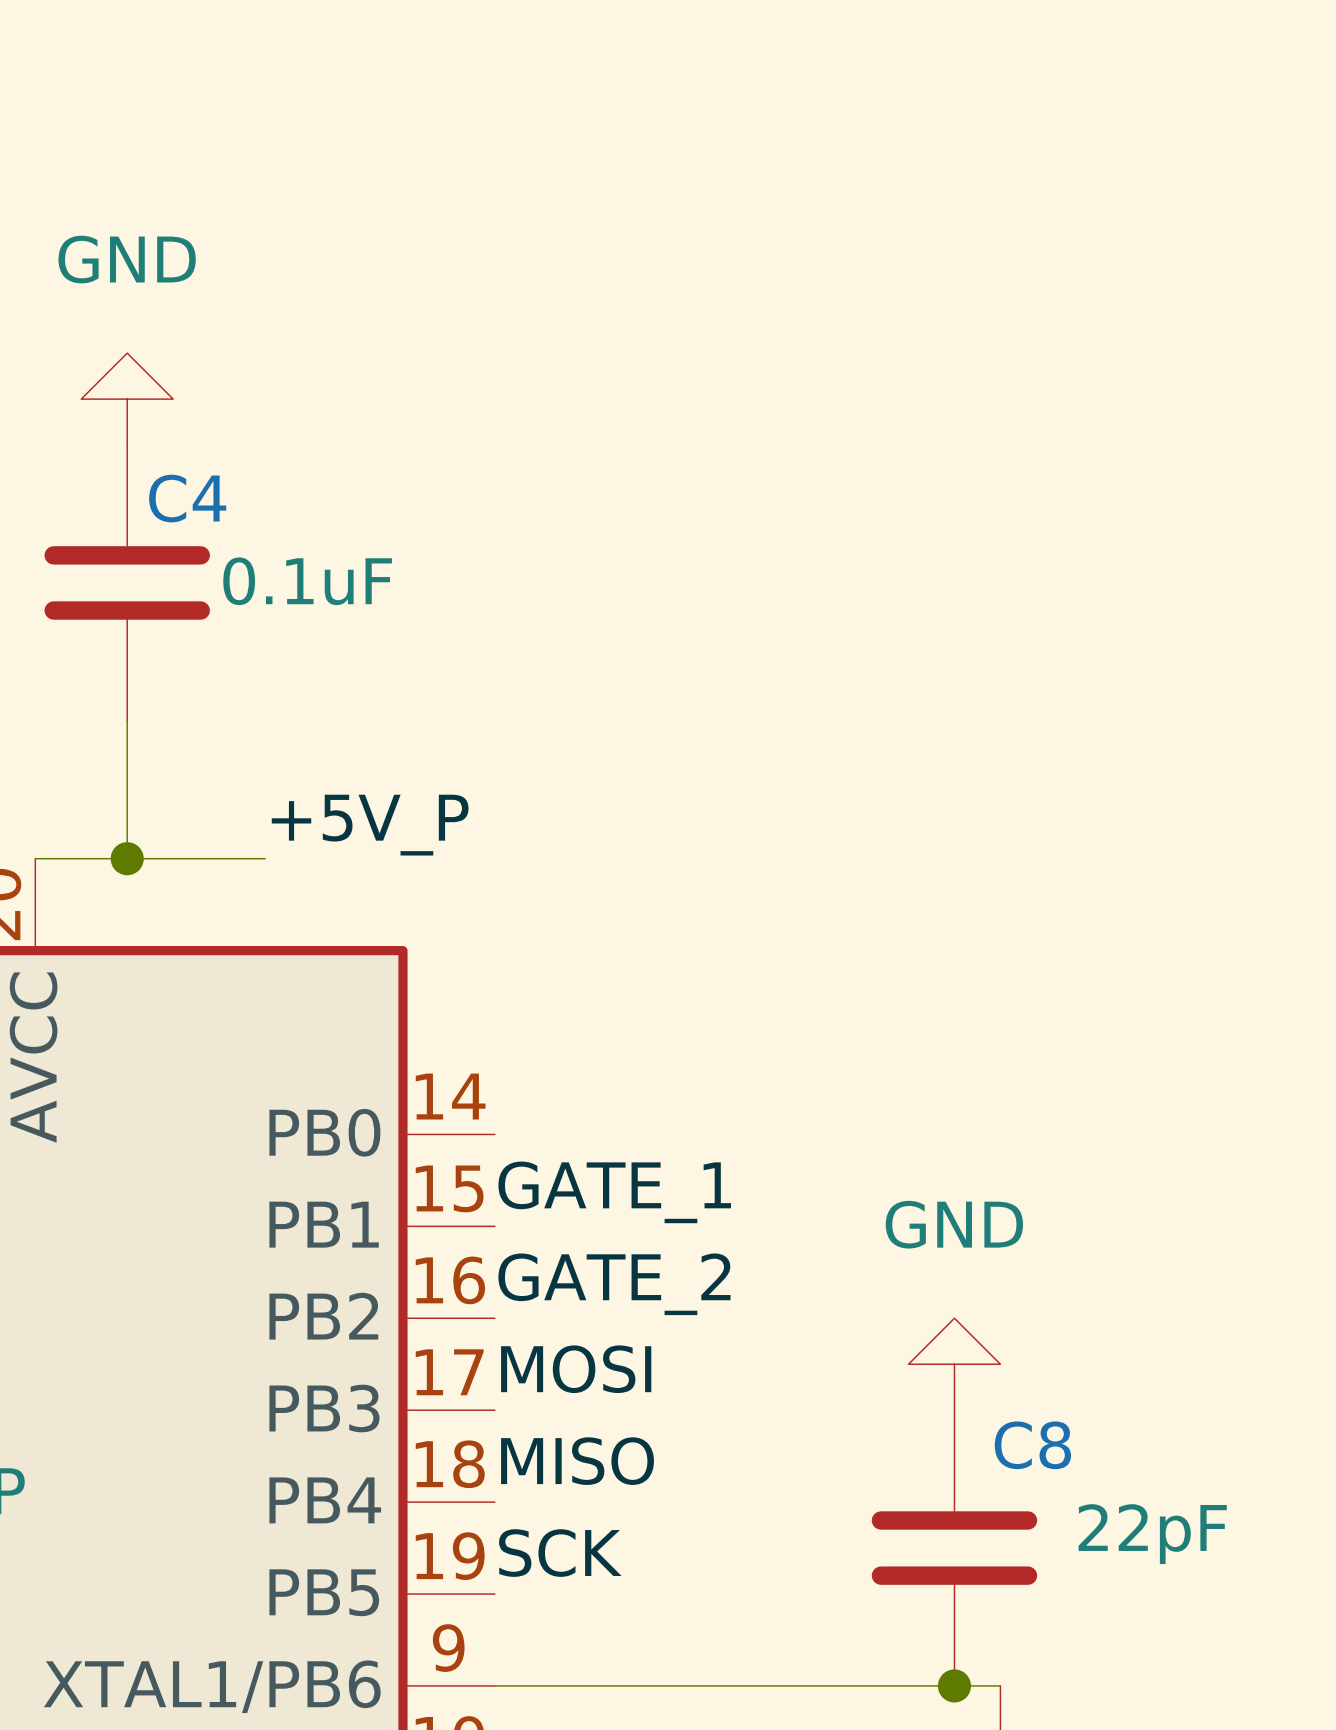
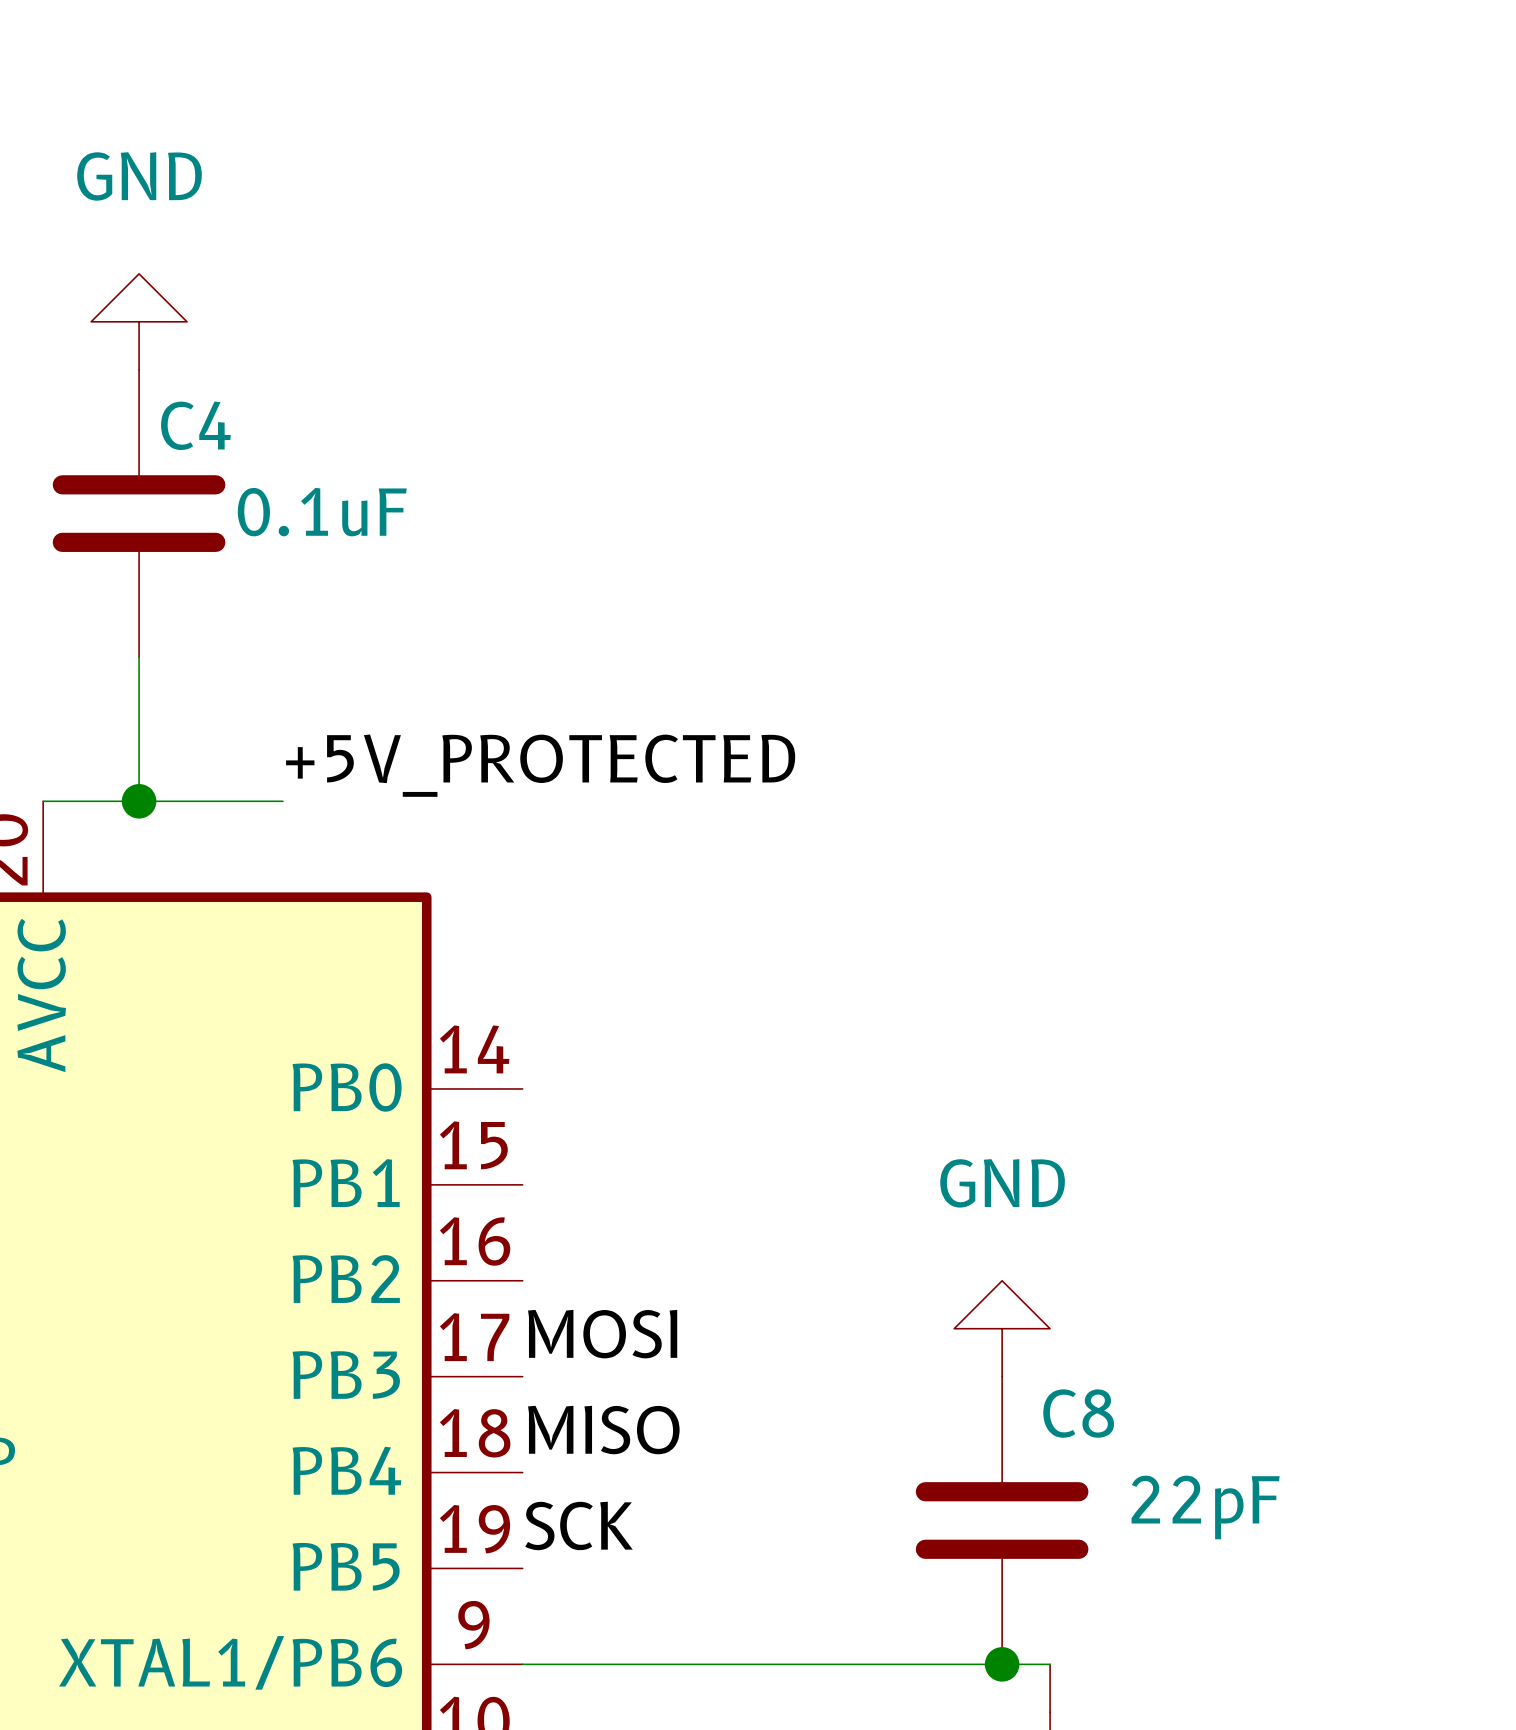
label: +5V_P (370, 825) -> +5V_PROTECTED (540, 765)
label: GATE_1 (614, 1192) -> none
label: GATE_2 (614, 1284) -> none

